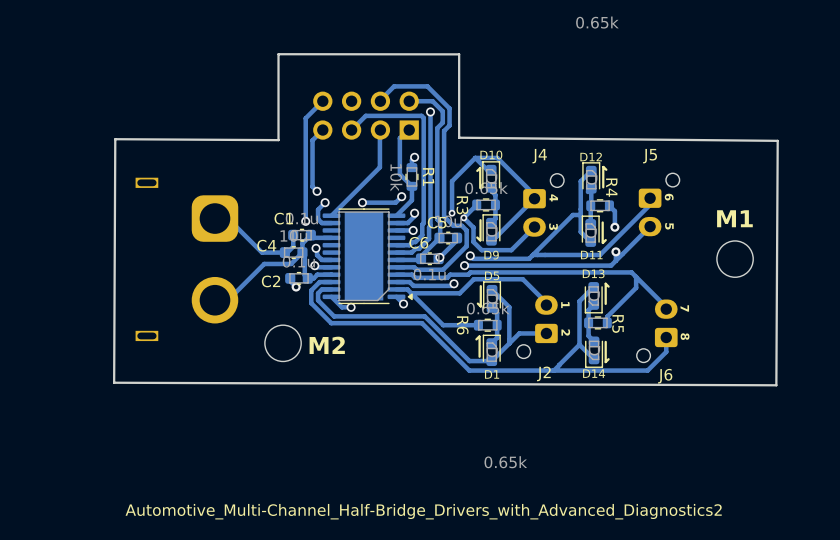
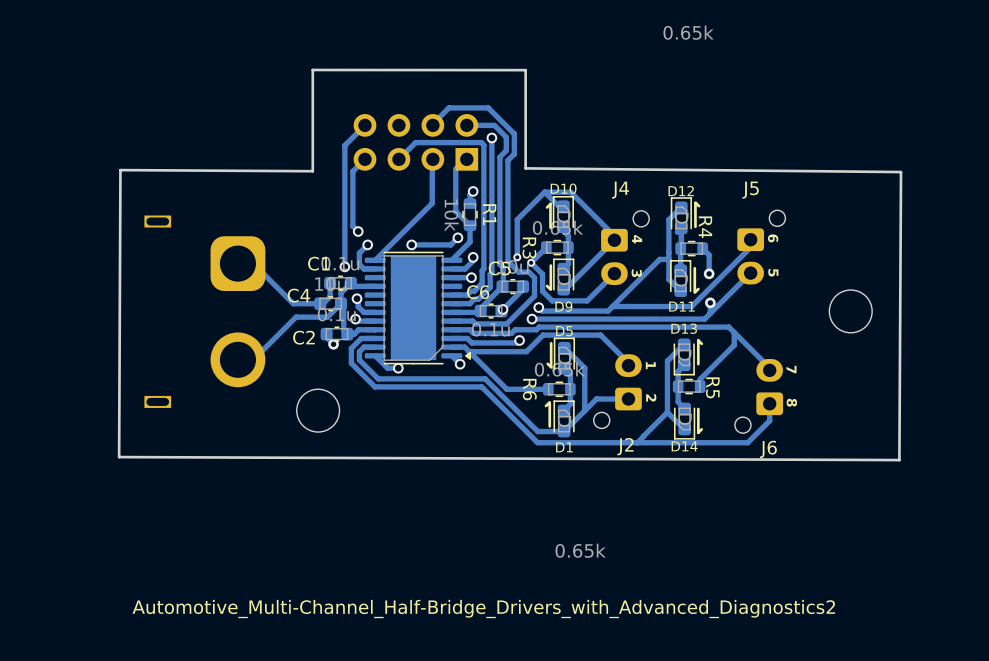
text: M1 (734, 218) -> none
text: M2 (327, 345) -> none

